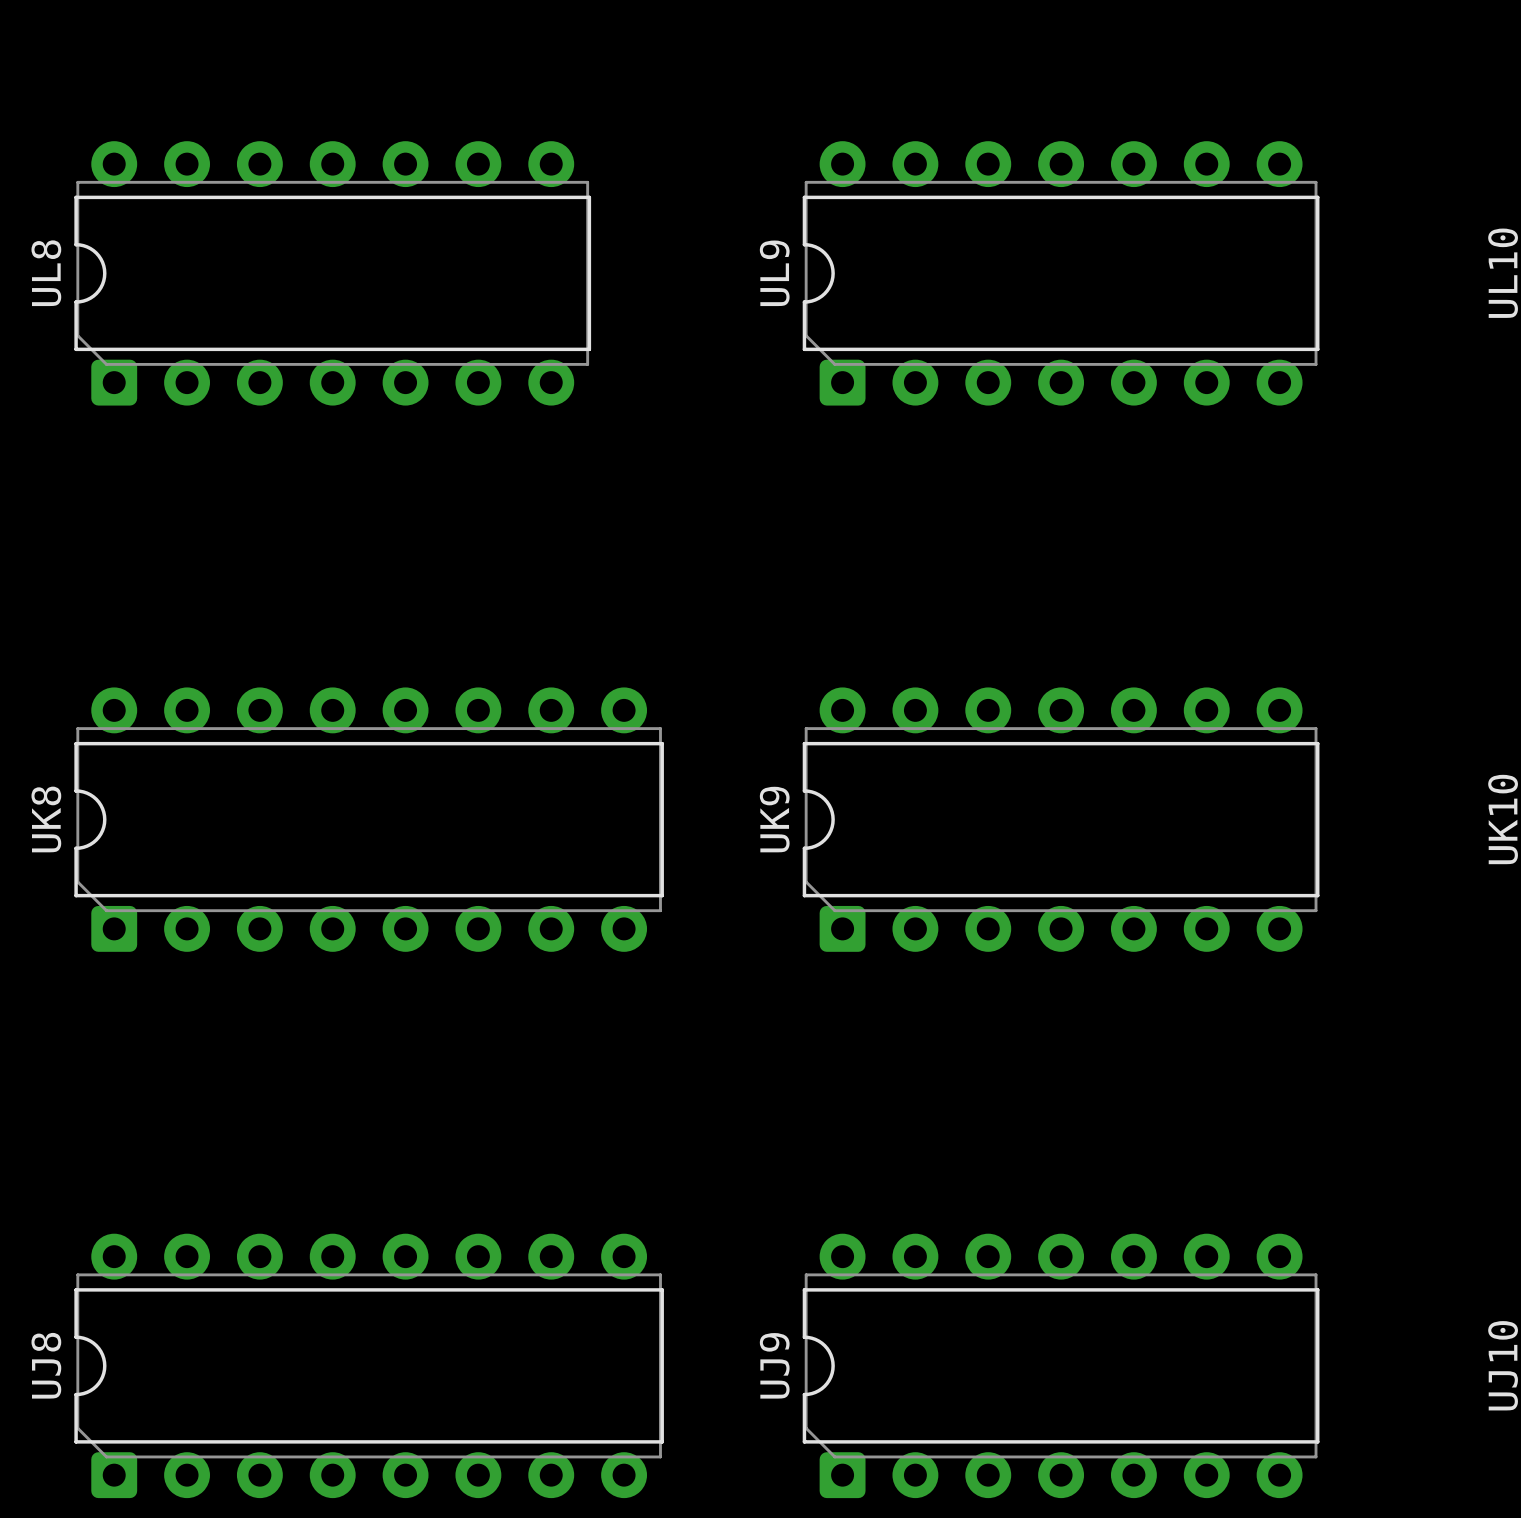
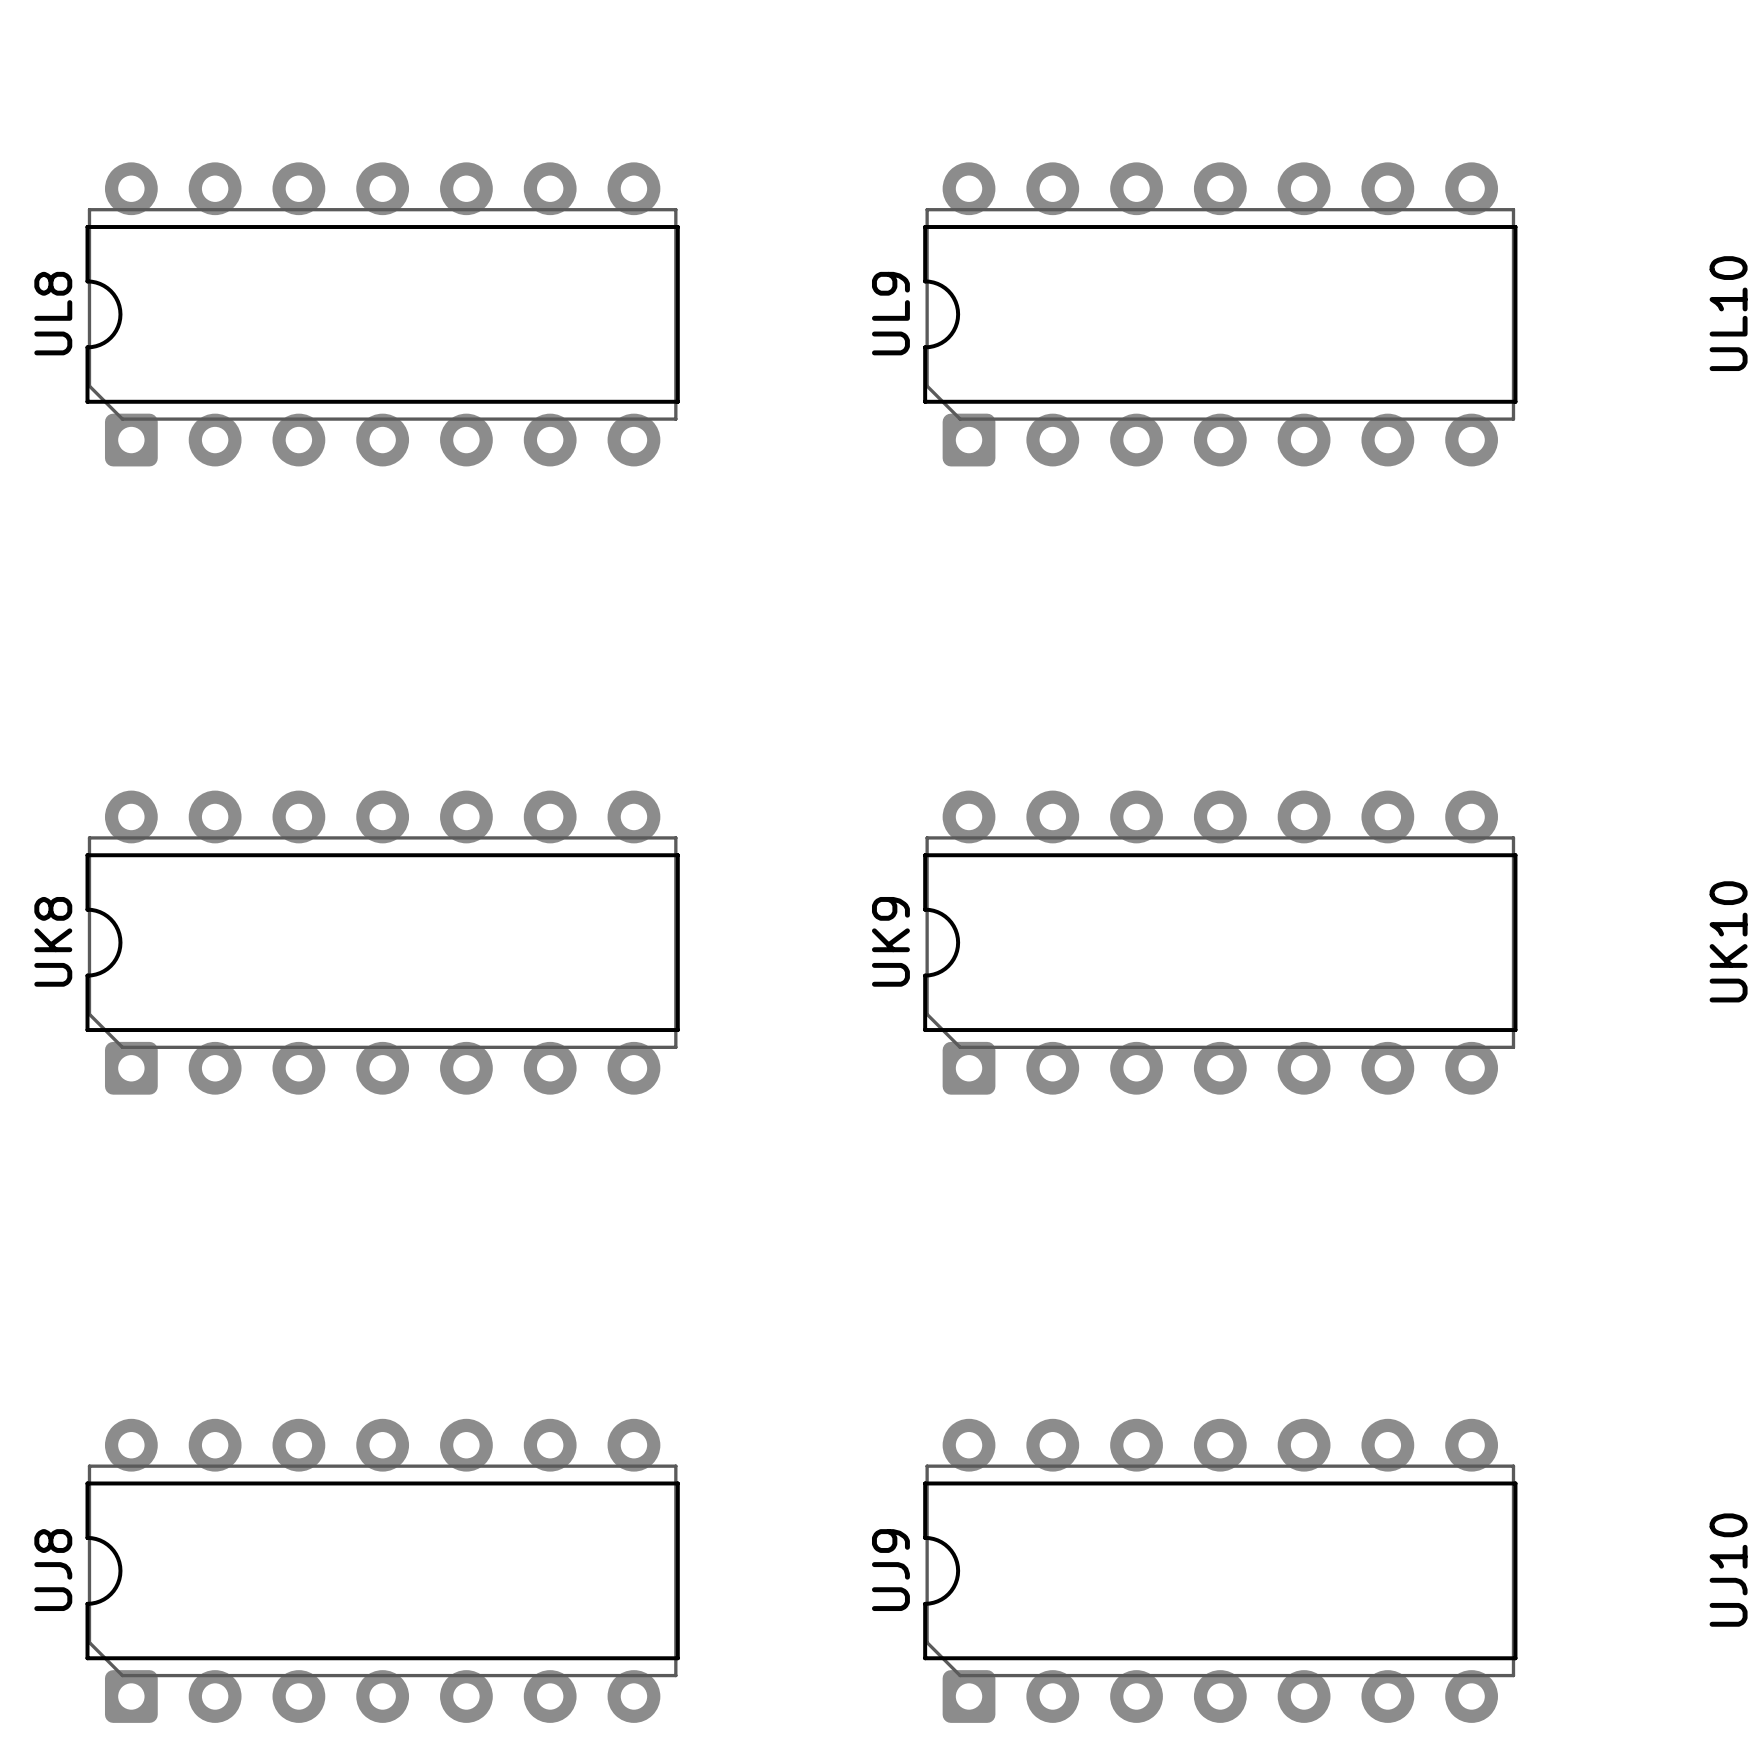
UK8 footprint: [74, 687, 664, 952] -> [85, 790, 680, 1095]
UJ8 footprint: [74, 1233, 664, 1499] -> [85, 1418, 680, 1723]

